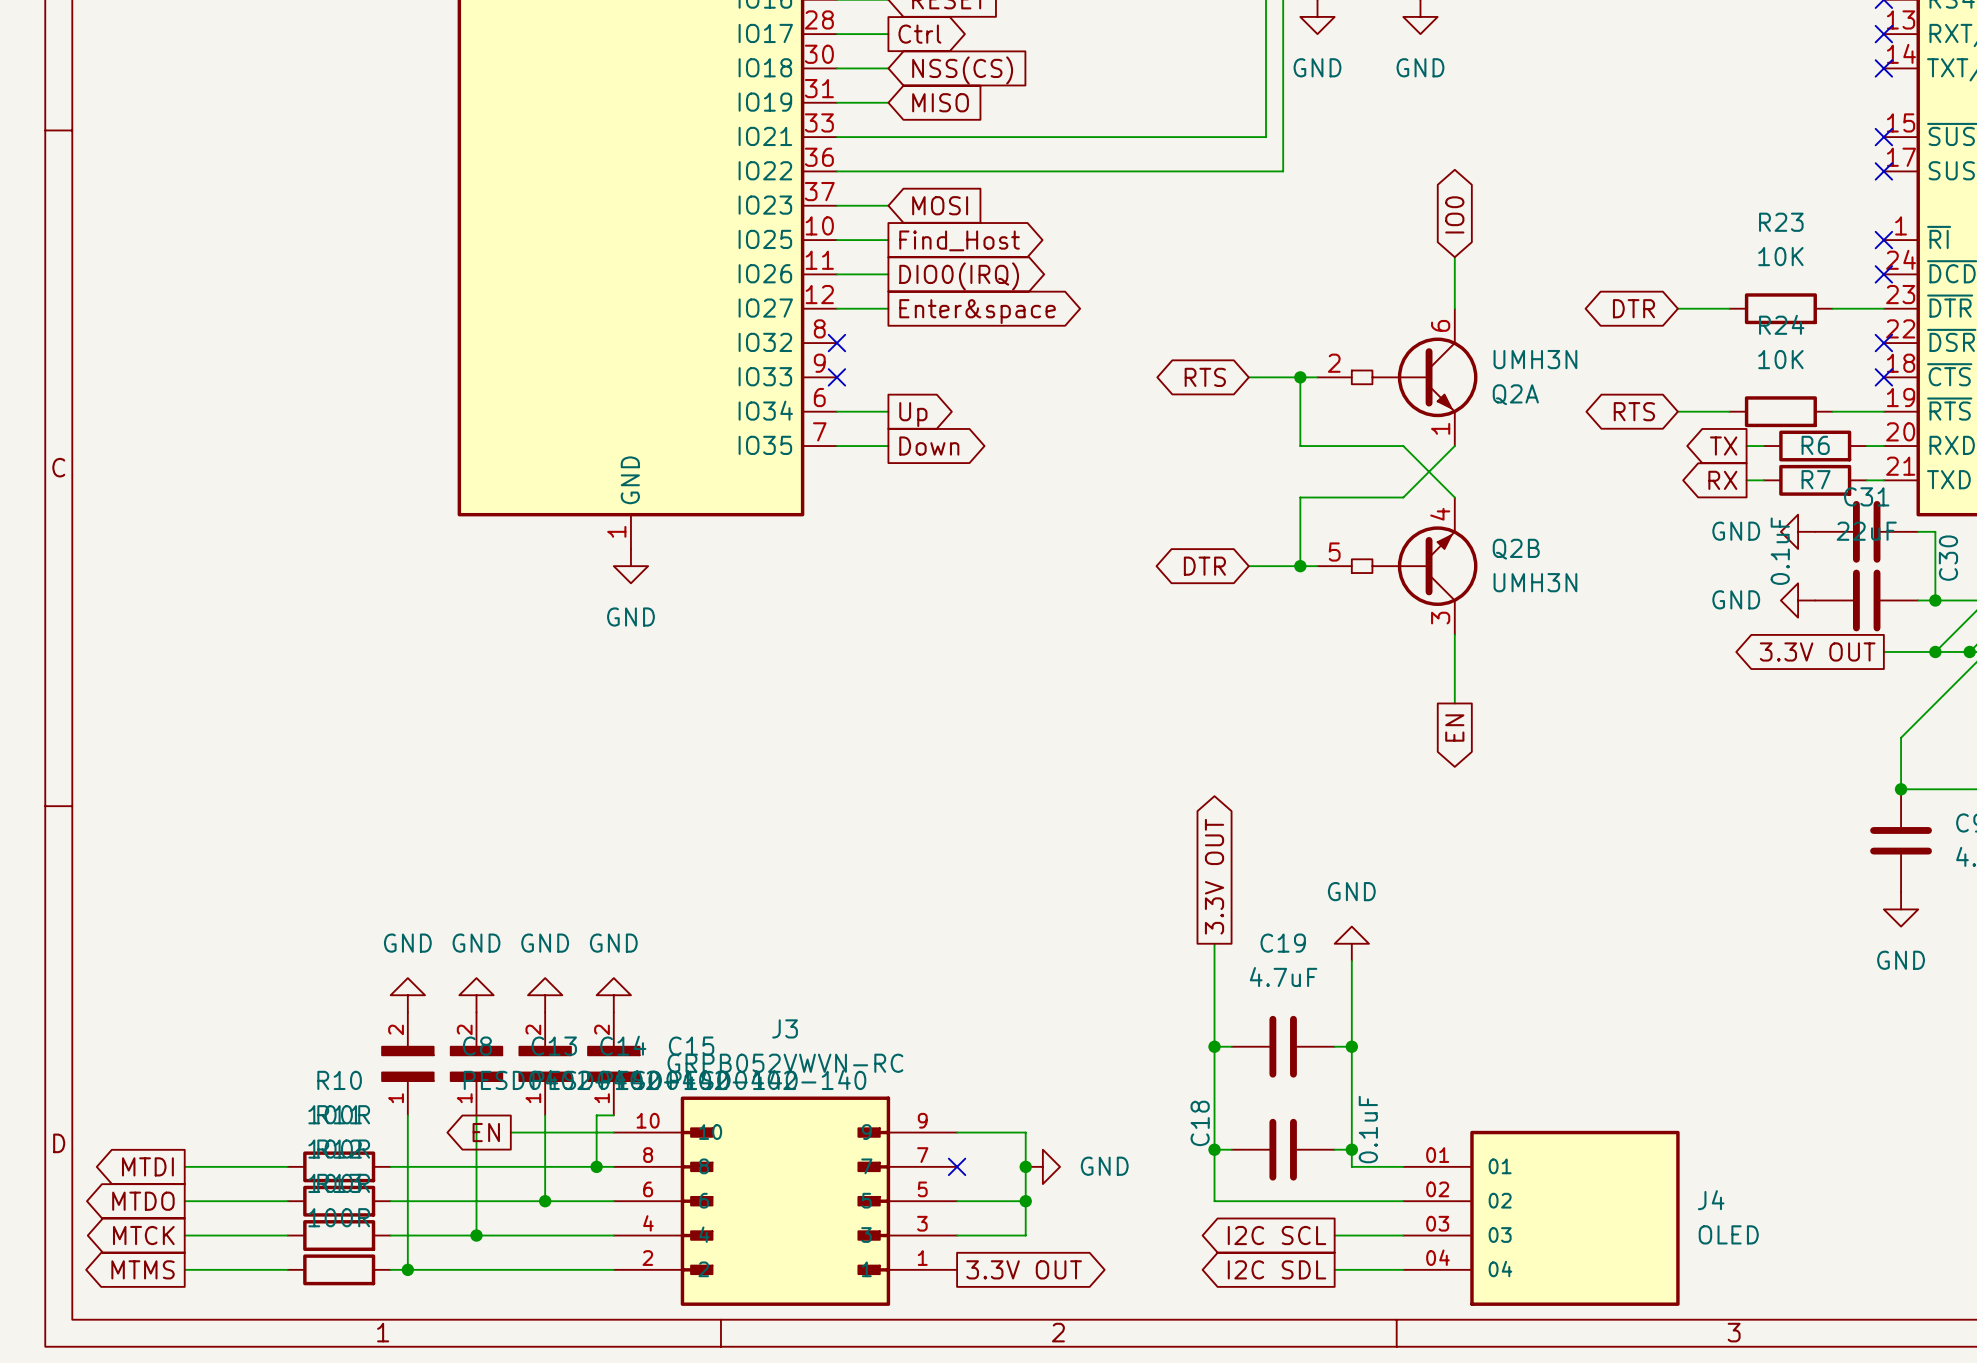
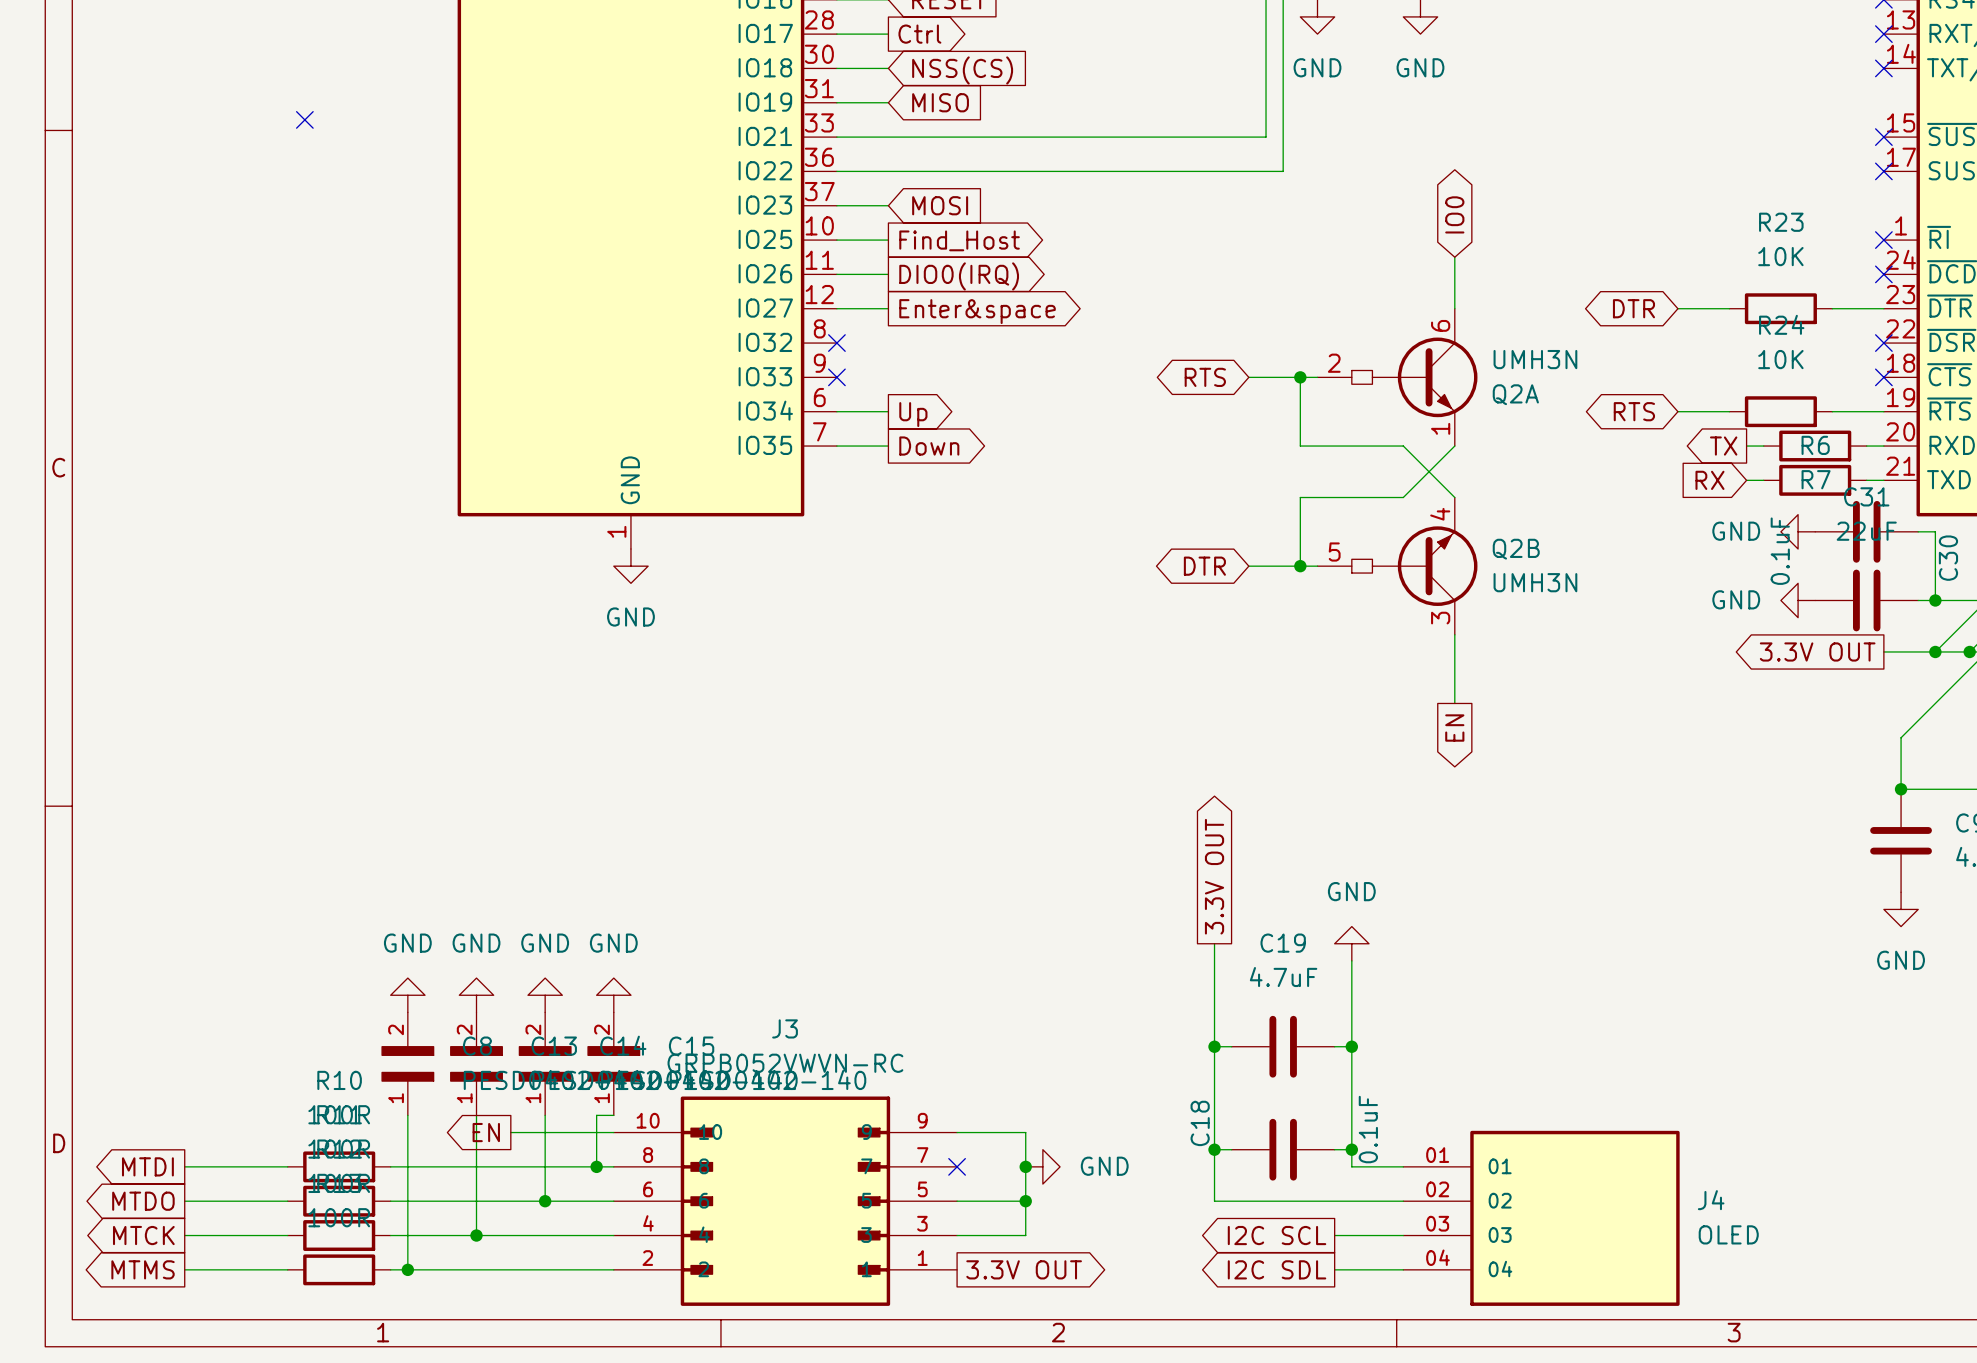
no-connect mark: none -> (304, 119)
global label shape: output (1722, 480) -> input (1709, 480)

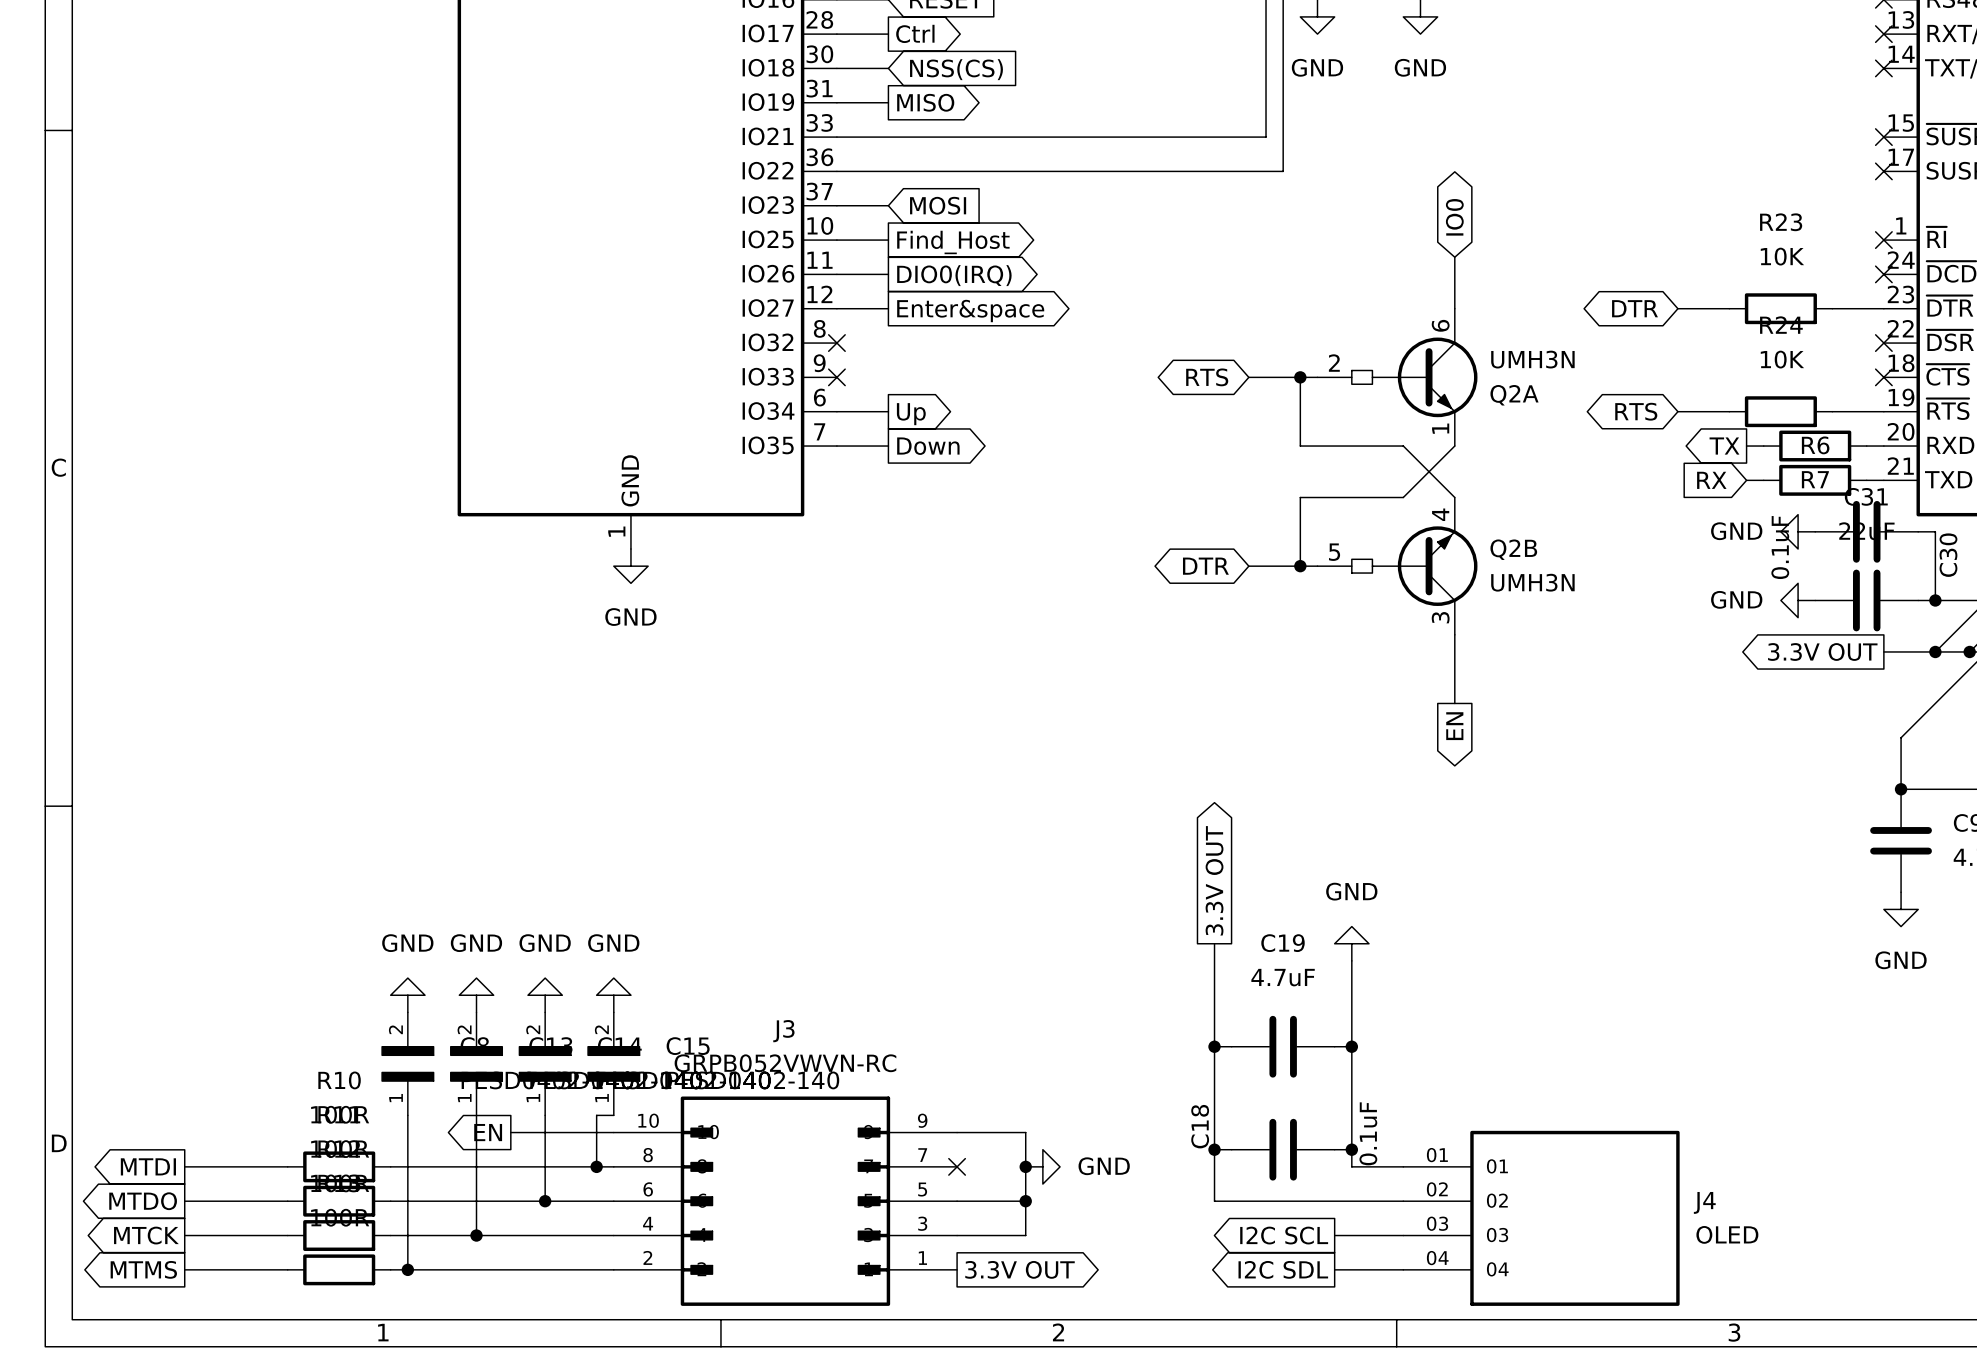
global label shape: input (940, 102) -> output (925, 102)
no-connect mark: (304, 119) -> none

